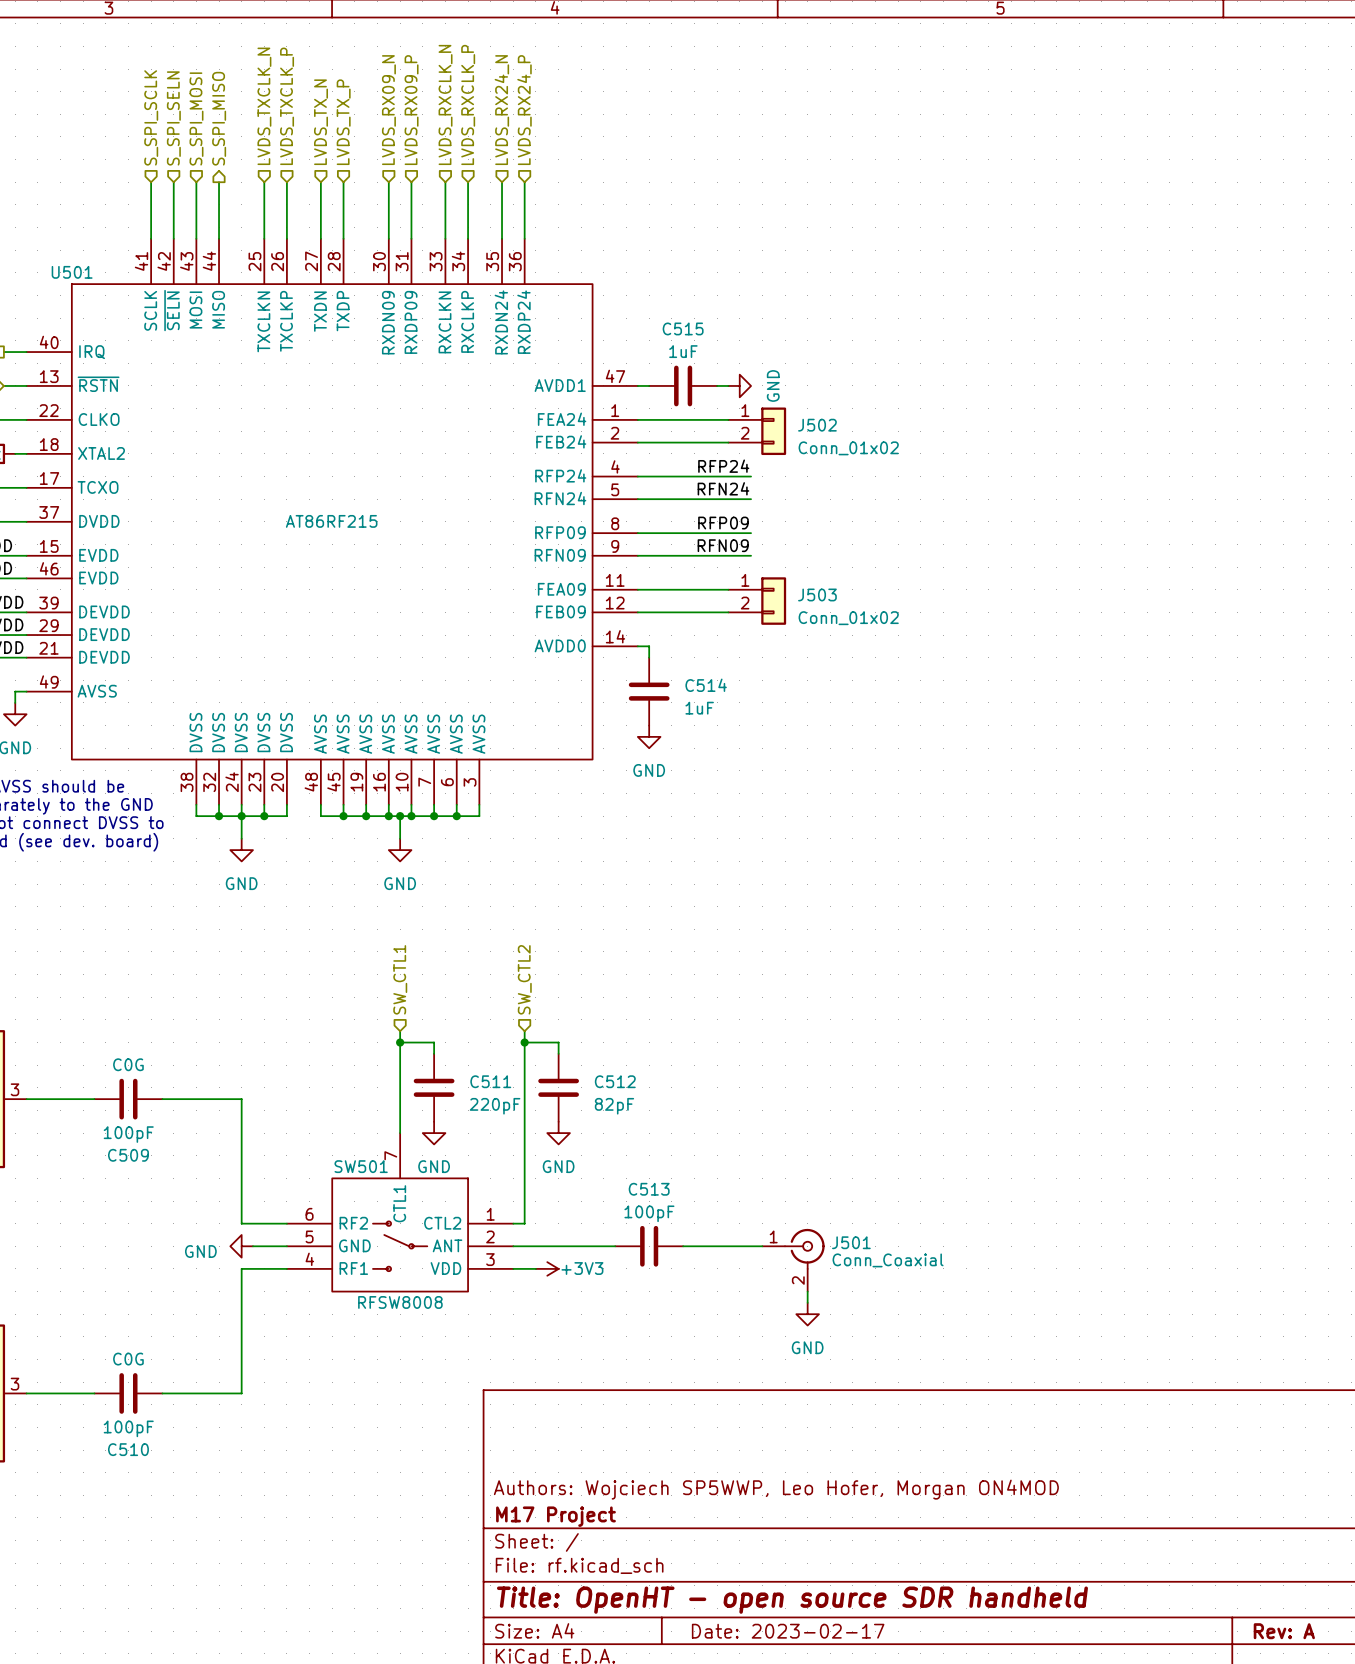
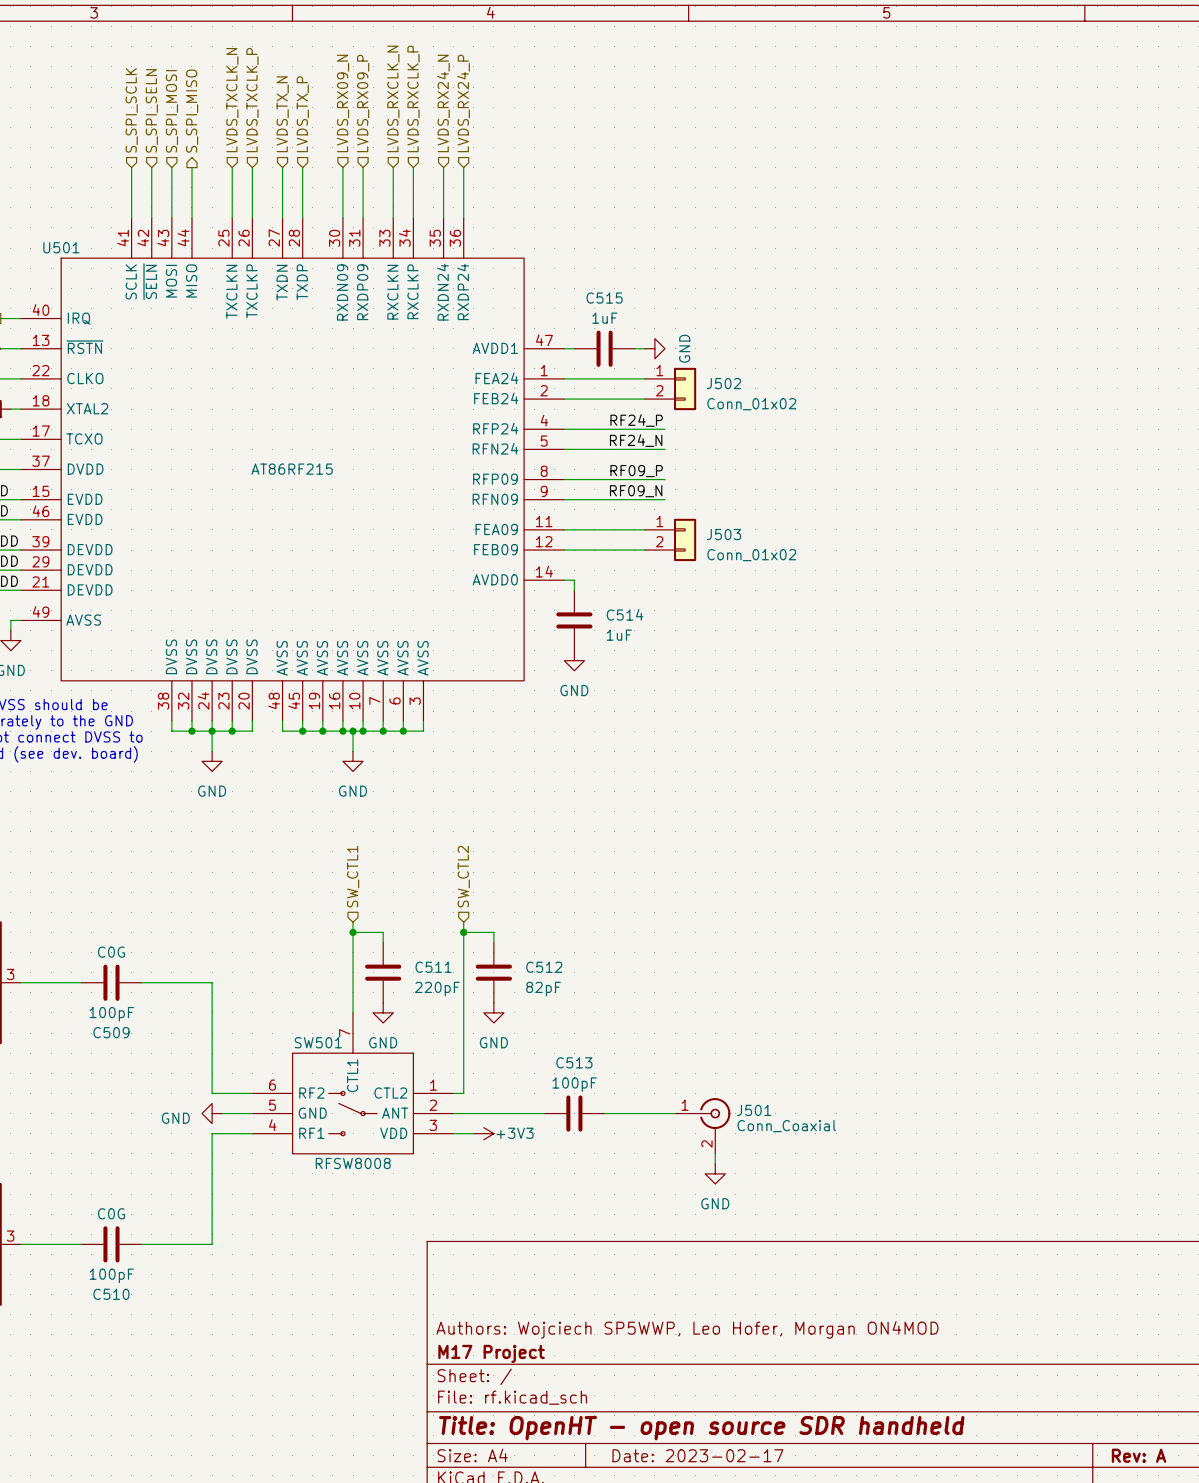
label: RFP24 (723, 466) -> RF24_P (636, 420)
label: RFN24 (723, 488) -> RF24_N (636, 440)
label: RFP09 (723, 523) -> RF09_P (636, 471)
label: RFN09 (723, 545) -> RF09_N (636, 491)

